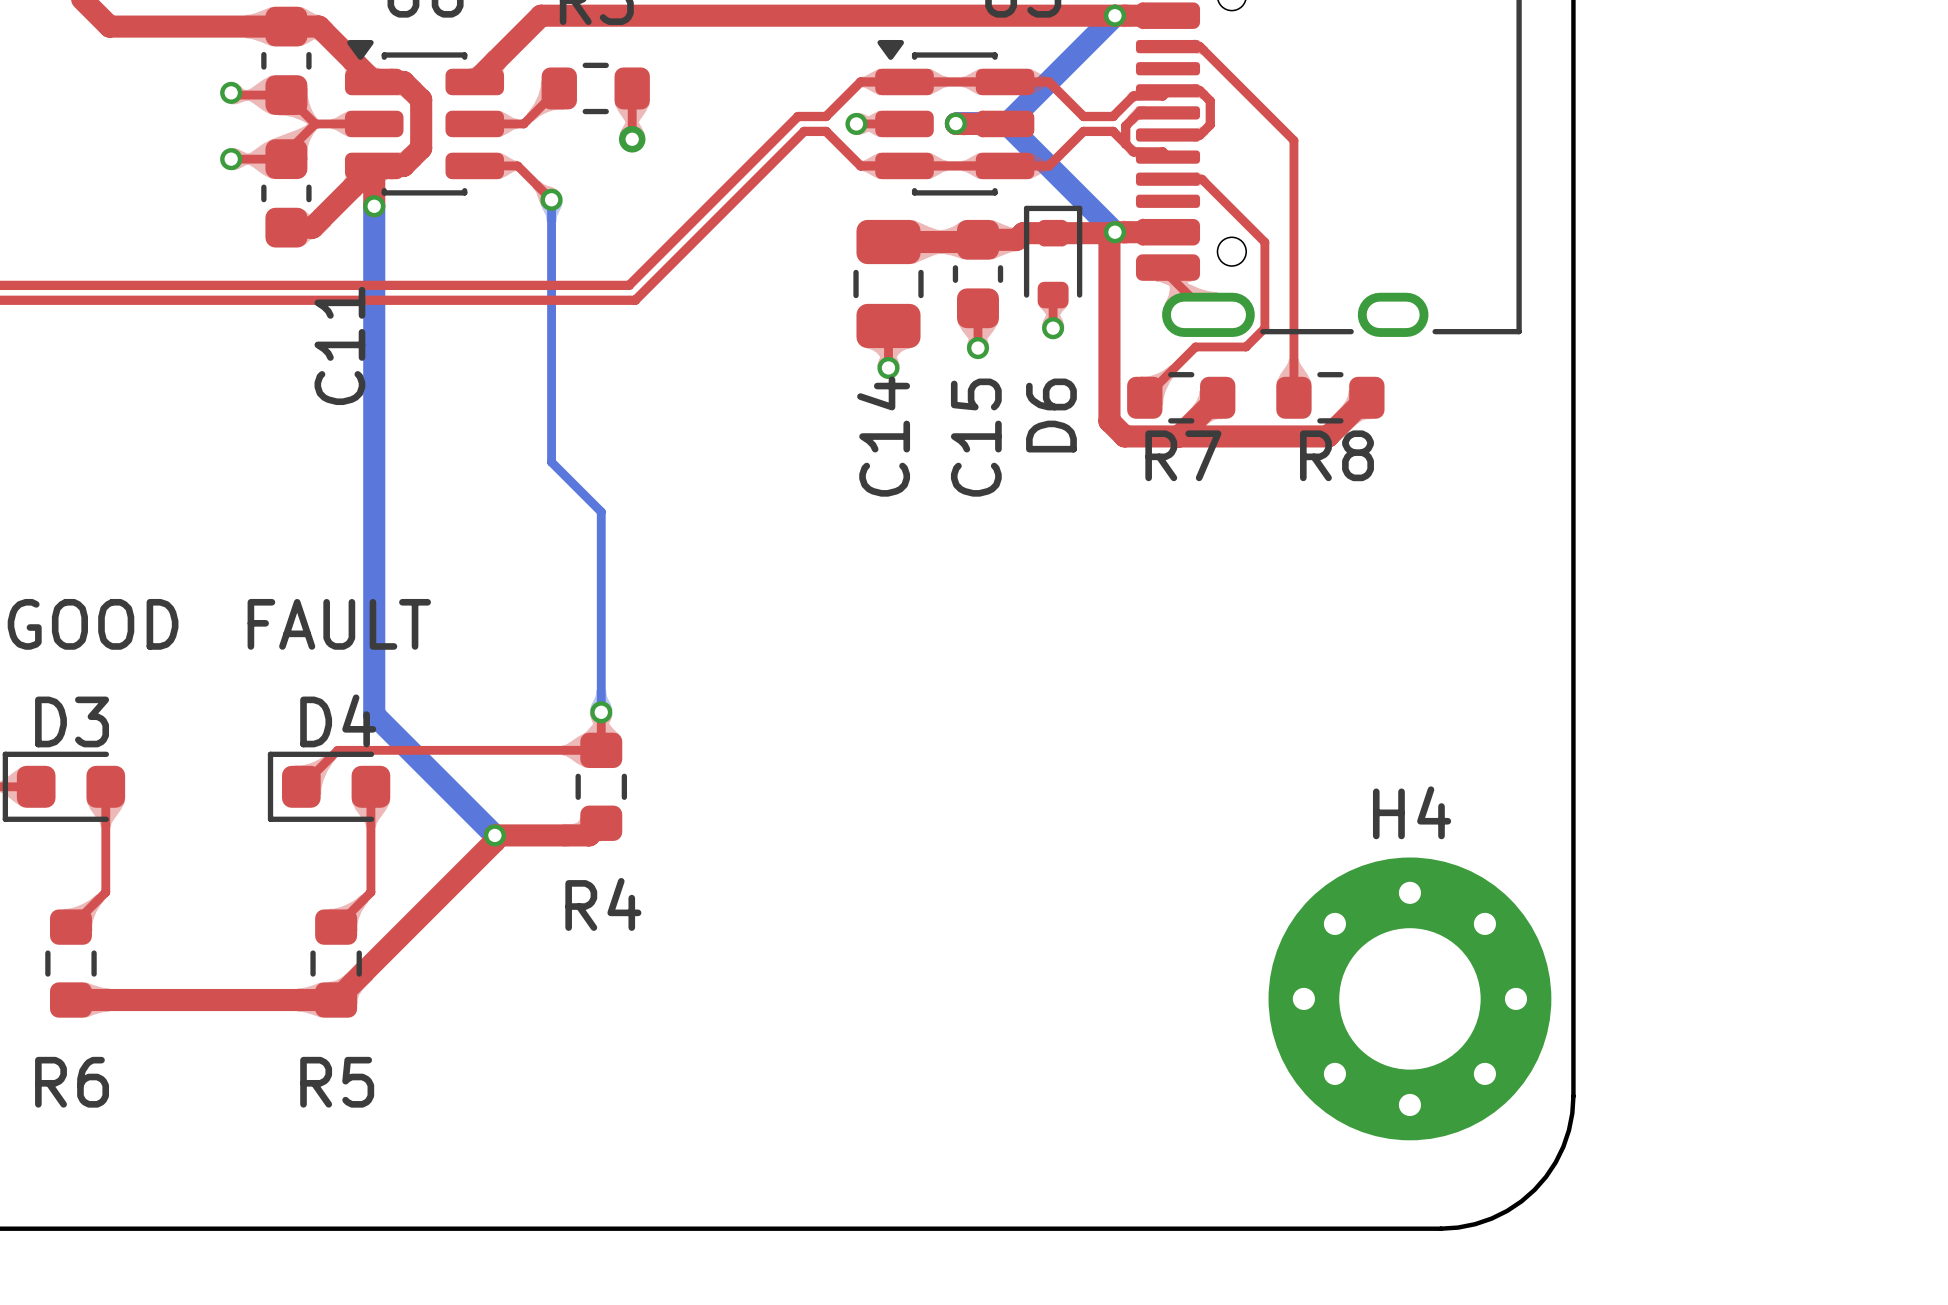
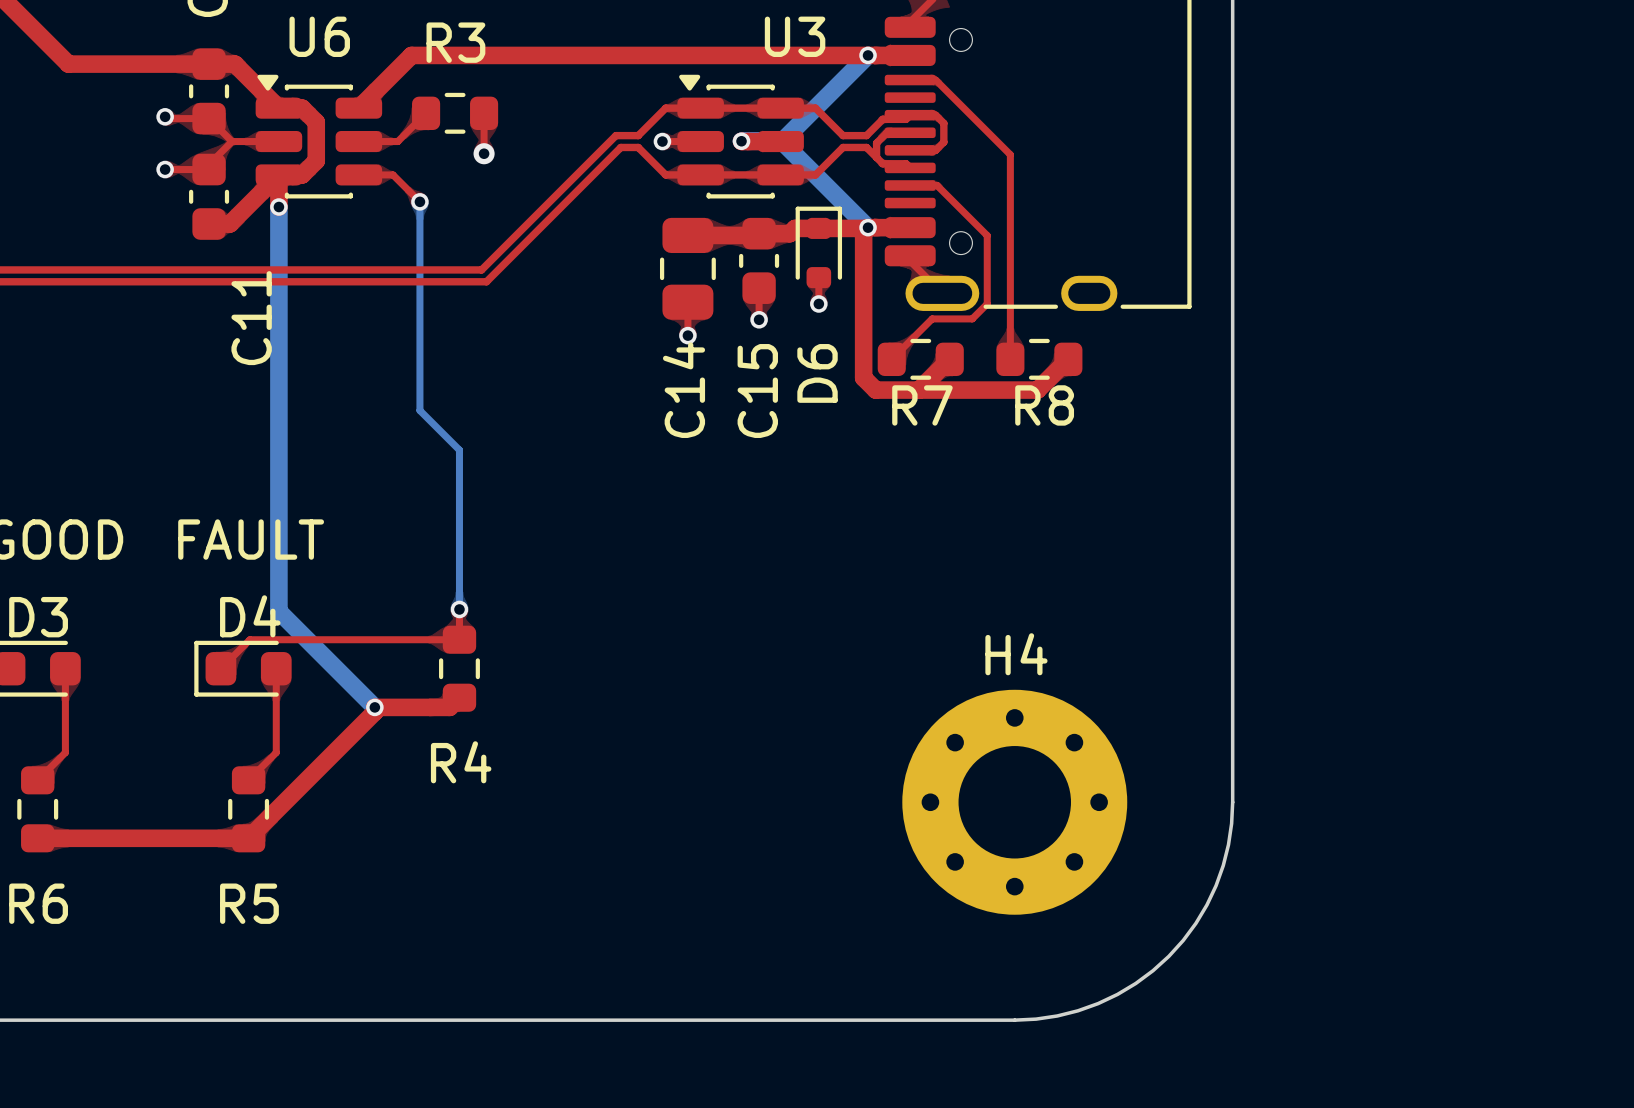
board edge: (1573, 954) (1572, 1113) (1568, 1130) (1555, 1162) (1534, 1189) (1507, 1210) (1475, 1224) (1458, 1227) (1299, 1228) -> (1232, 802) (1228, 844) (1216, 885) (1195, 923) (1168, 956) (1135, 983) (1098, 1003) (1057, 1015) (1014, 1020)
H4 position: (1409, 998) -> (1014, 802)

